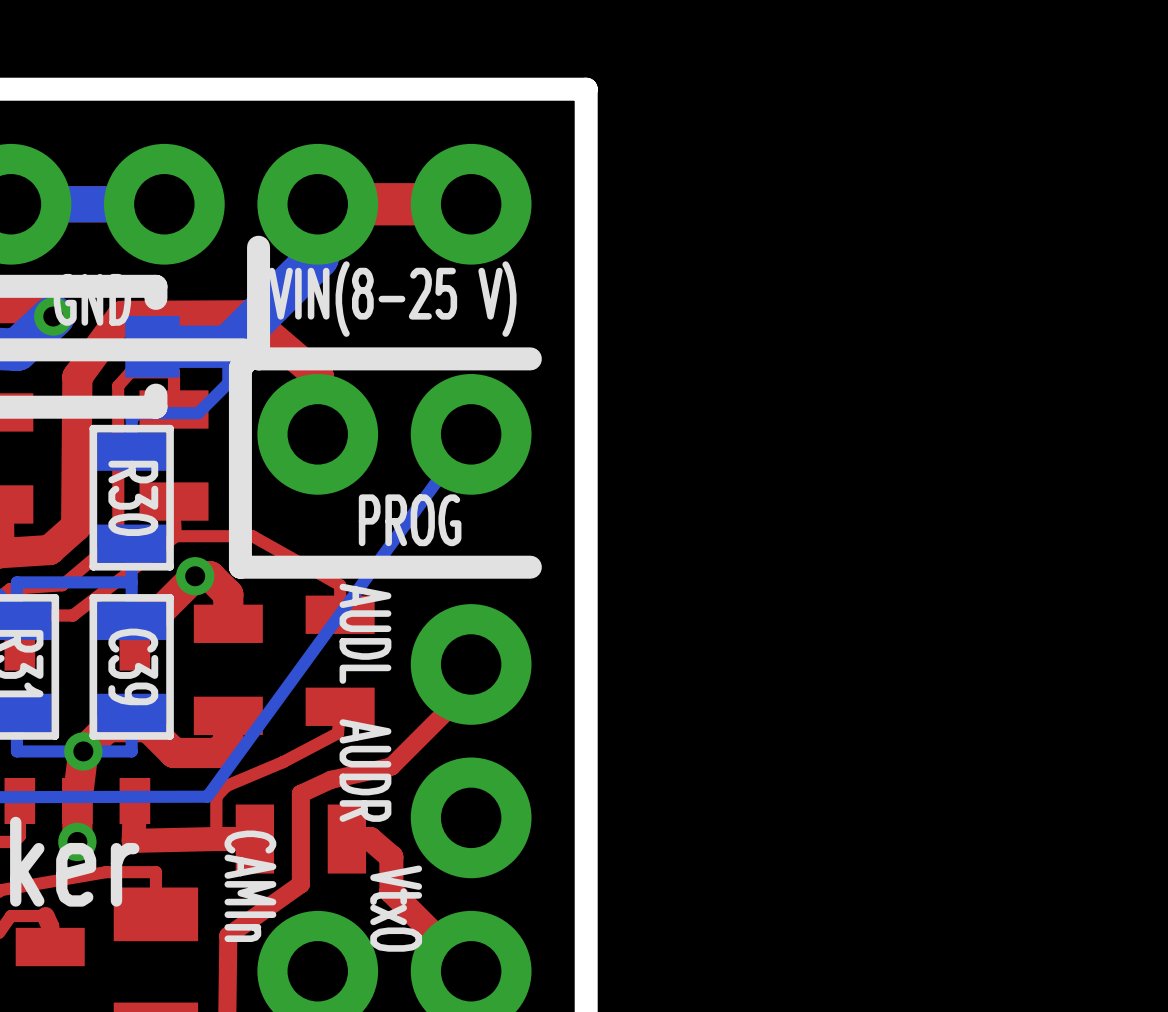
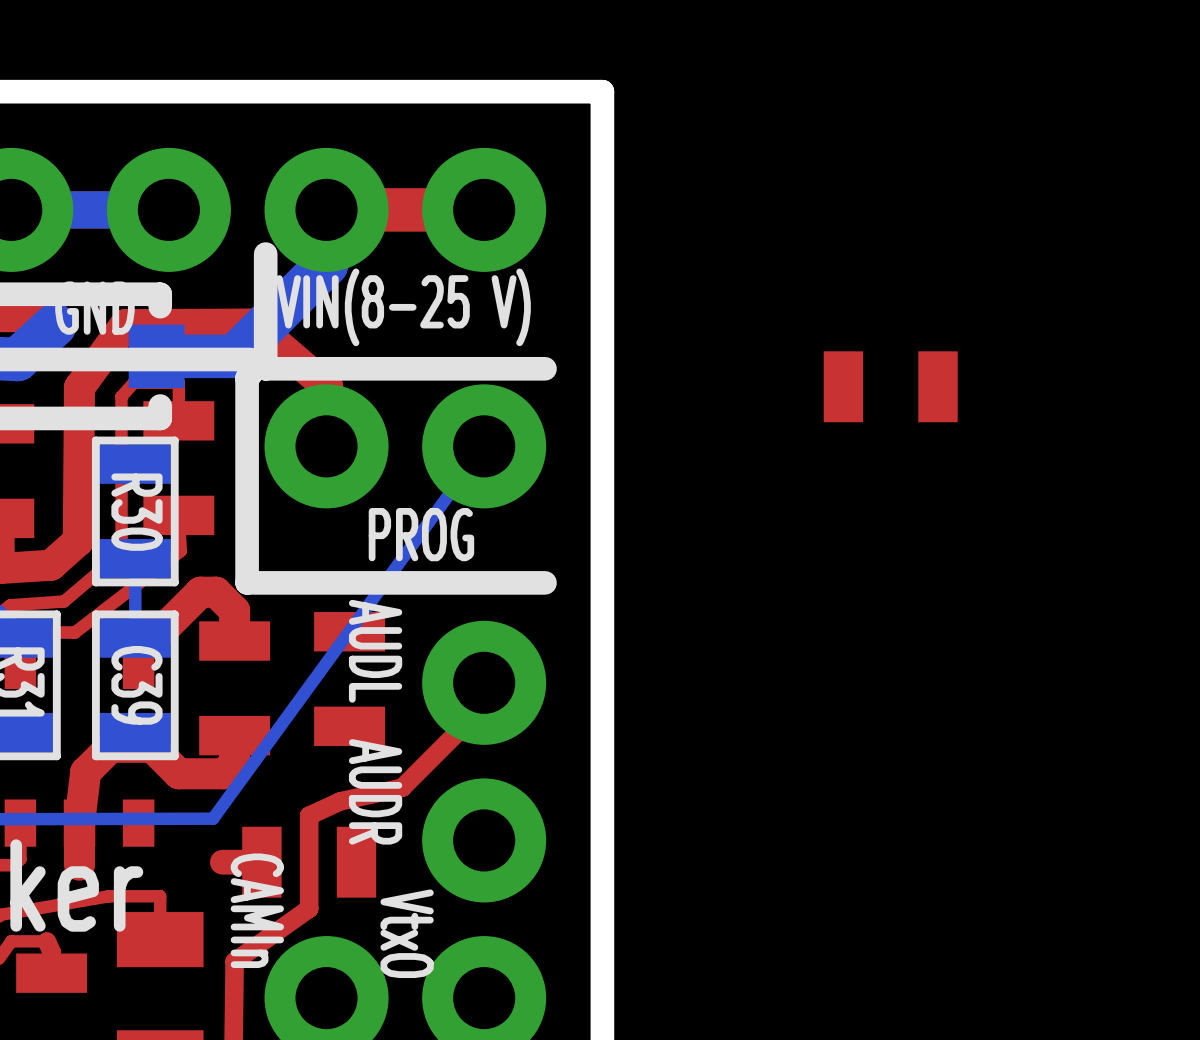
via: (53, 316) -> none
bottom track: (228, 343) (228, 383) (198, 413) (137, 413) (131, 419) (131, 451) -> none
part: none -> (890, 386)
top track: (175, 536) (252, 536) (340, 585) (340, 614) -> none
via: (195, 576) -> none
bottom track: (131, 582) (16, 582) (16, 620) -> none
top track: (340, 706) (338, 733) (282, 762) (226, 786) (216, 796) (216, 839) (133, 840) (134, 800) -> none
bottom track: (131, 712) (131, 751) (16, 751) (16, 712) -> none
via: (83, 751) -> none
top track: (346, 839) (370, 839) (391, 857) (391, 891) (471, 971) -> none
via: (77, 841) -> none

